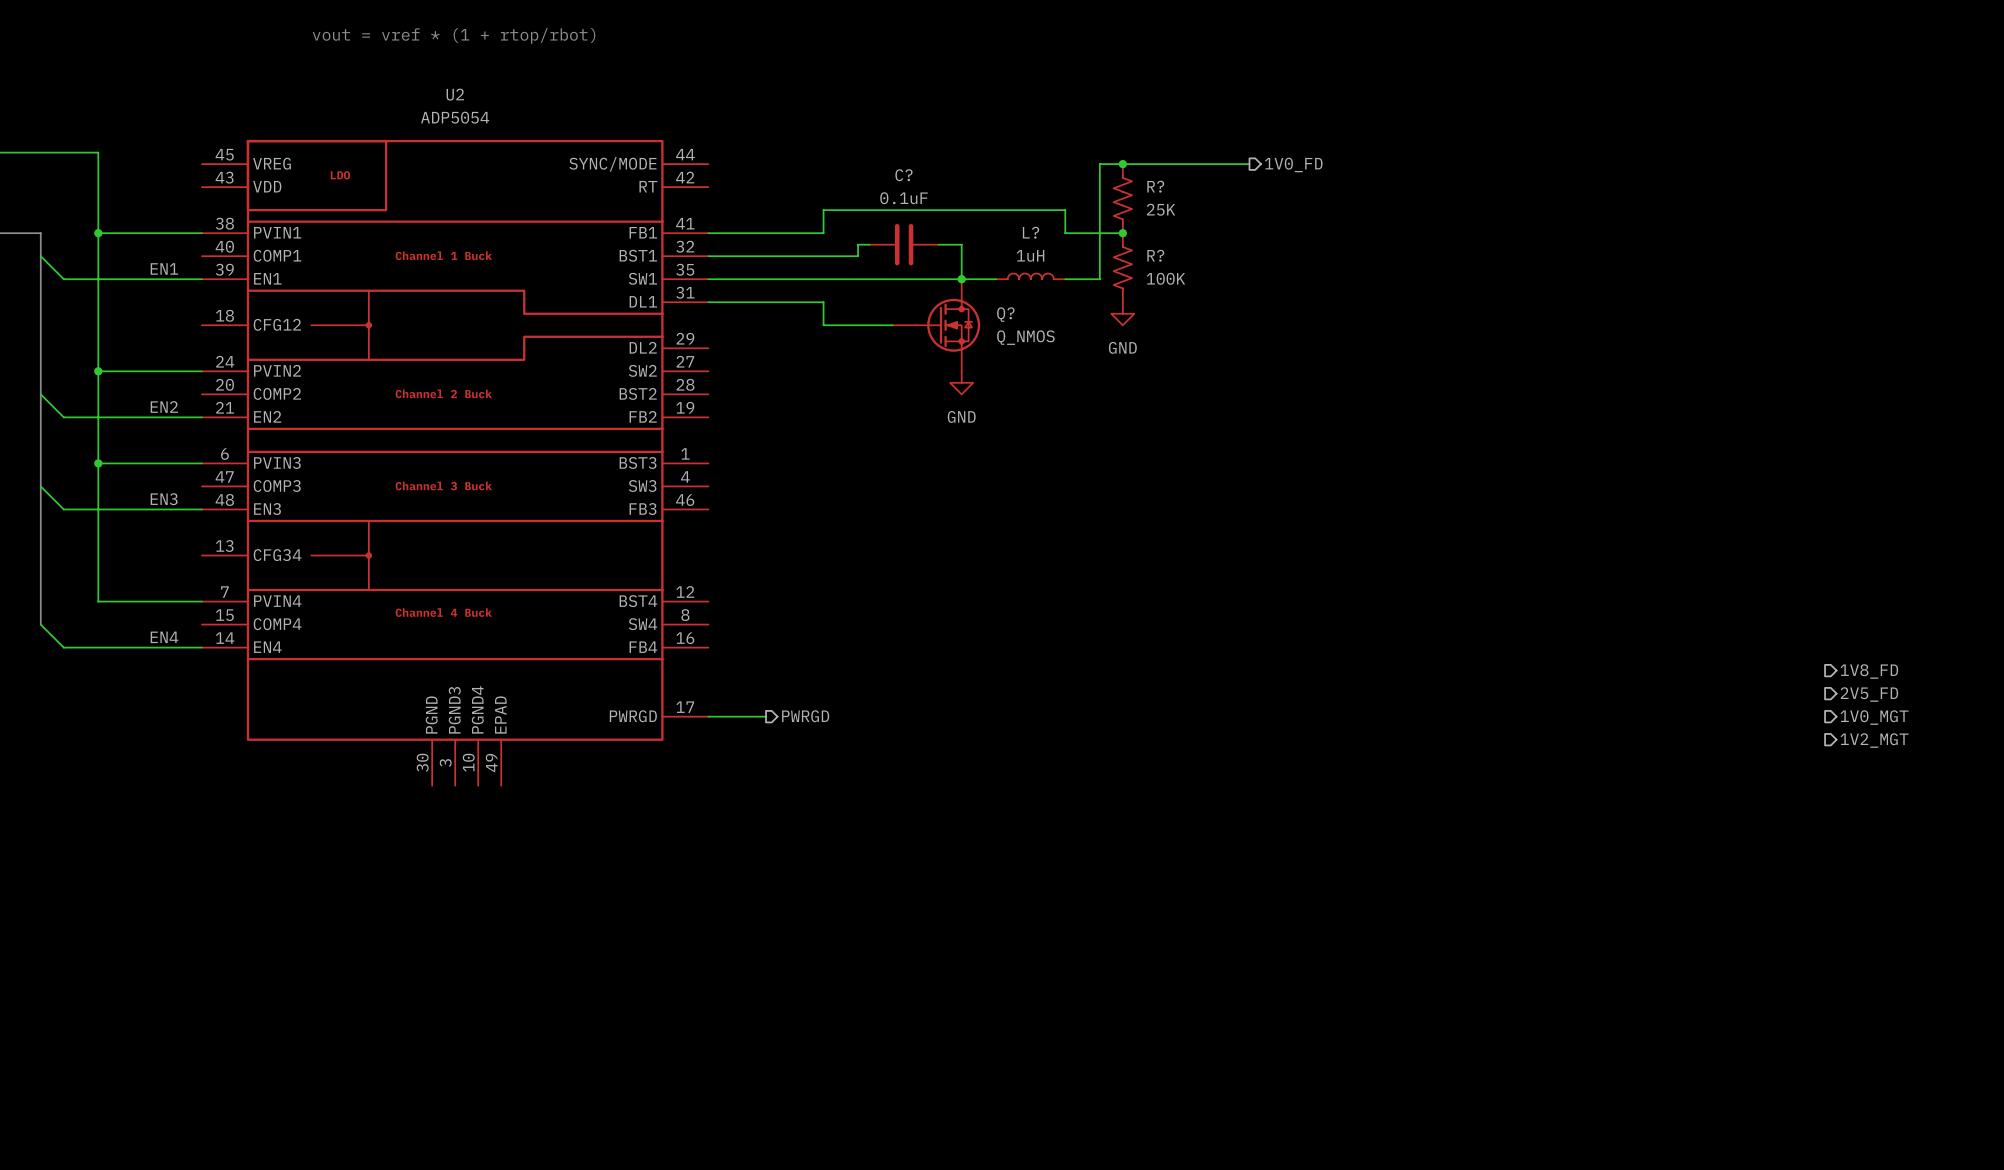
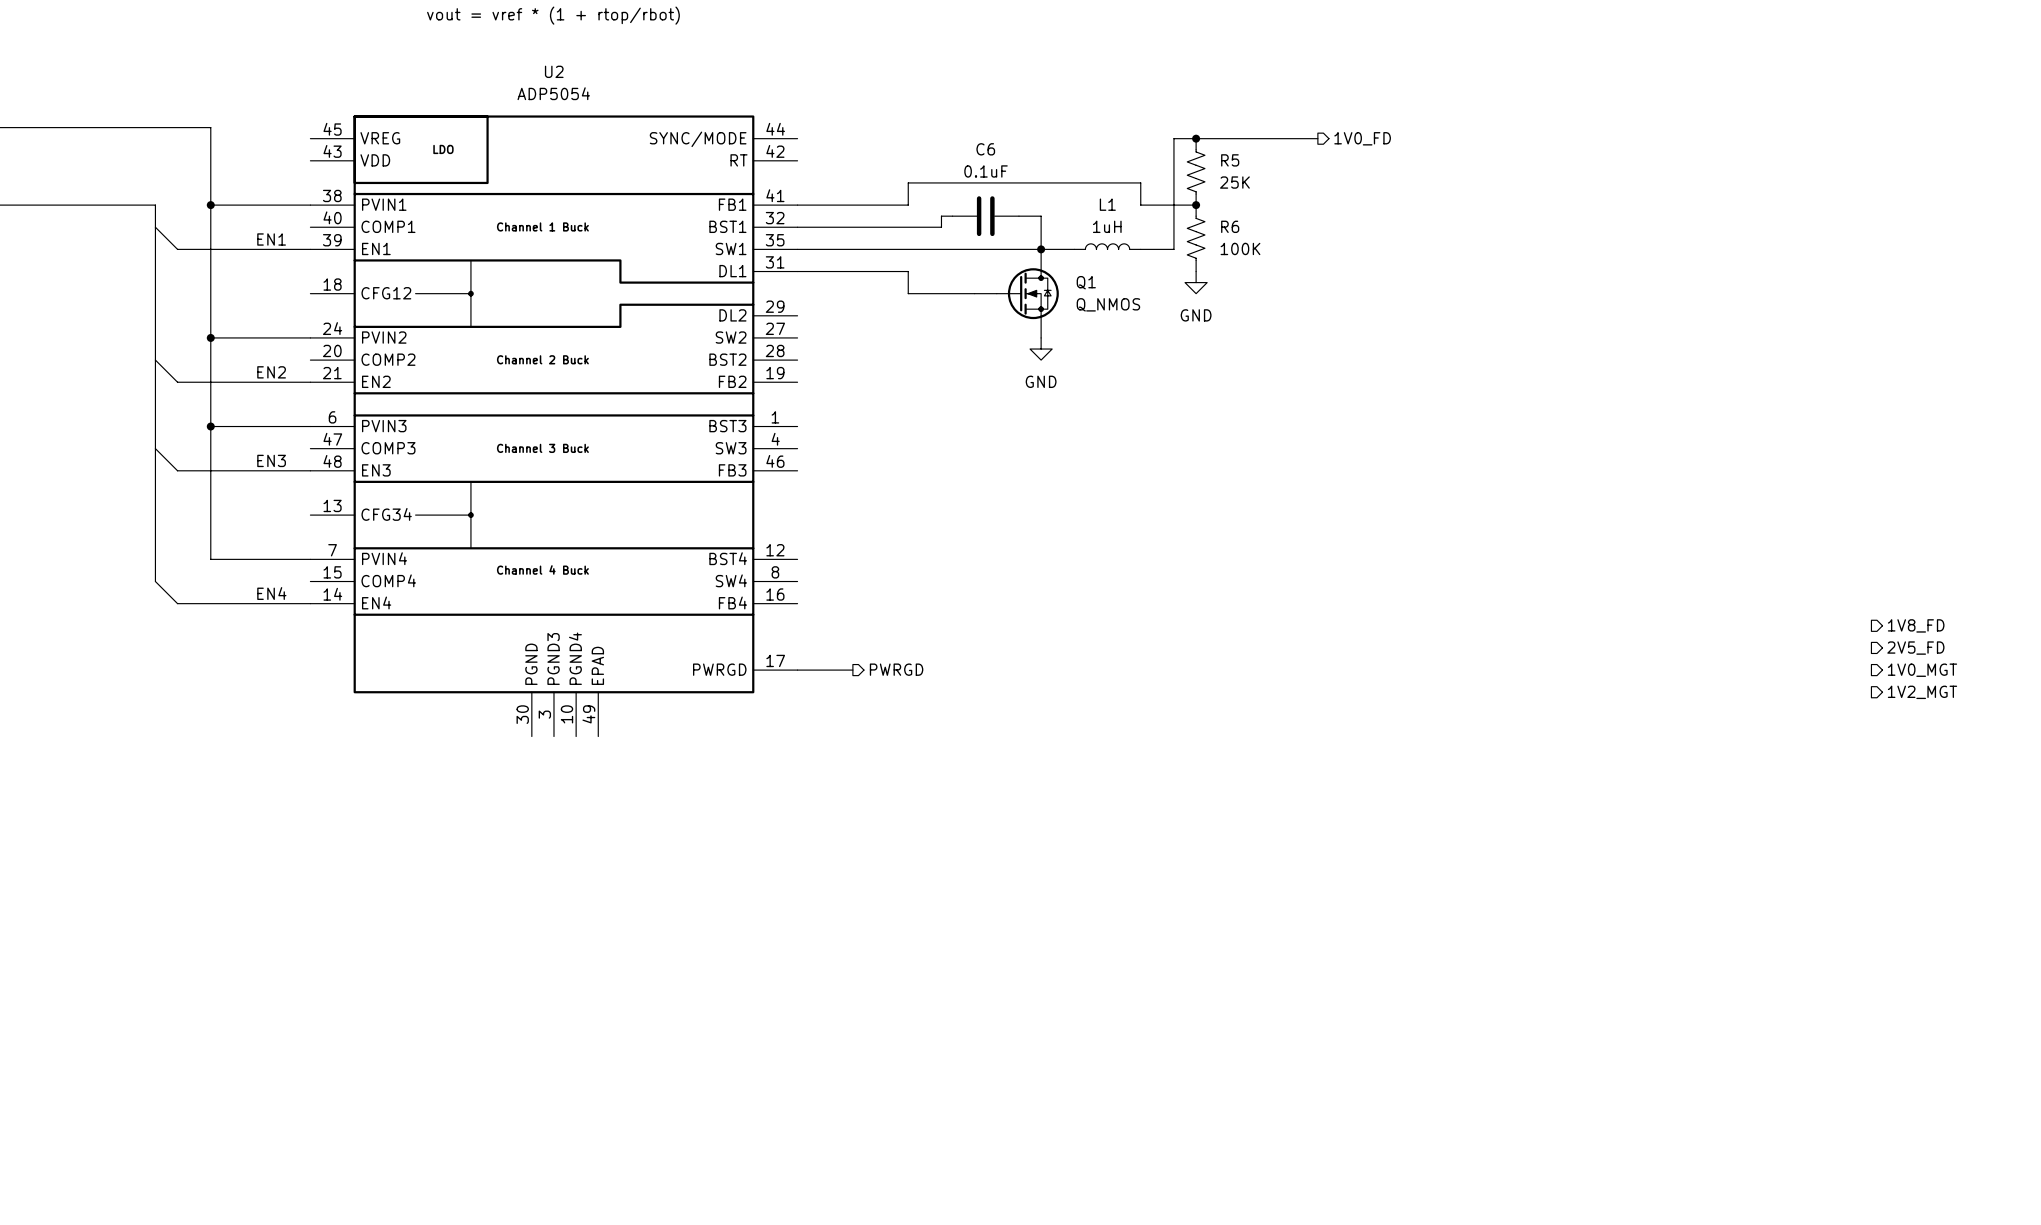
C? name: C? (903, 175) -> C6 (985, 149)
R? name: R? (1155, 186) -> R5 (1230, 160)
L? name: L? (1031, 232) -> L1 (1107, 204)
R? name: R? (1155, 255) -> R6 (1230, 226)
Q? name: Q? (1005, 314) -> Q1 (1086, 282)

